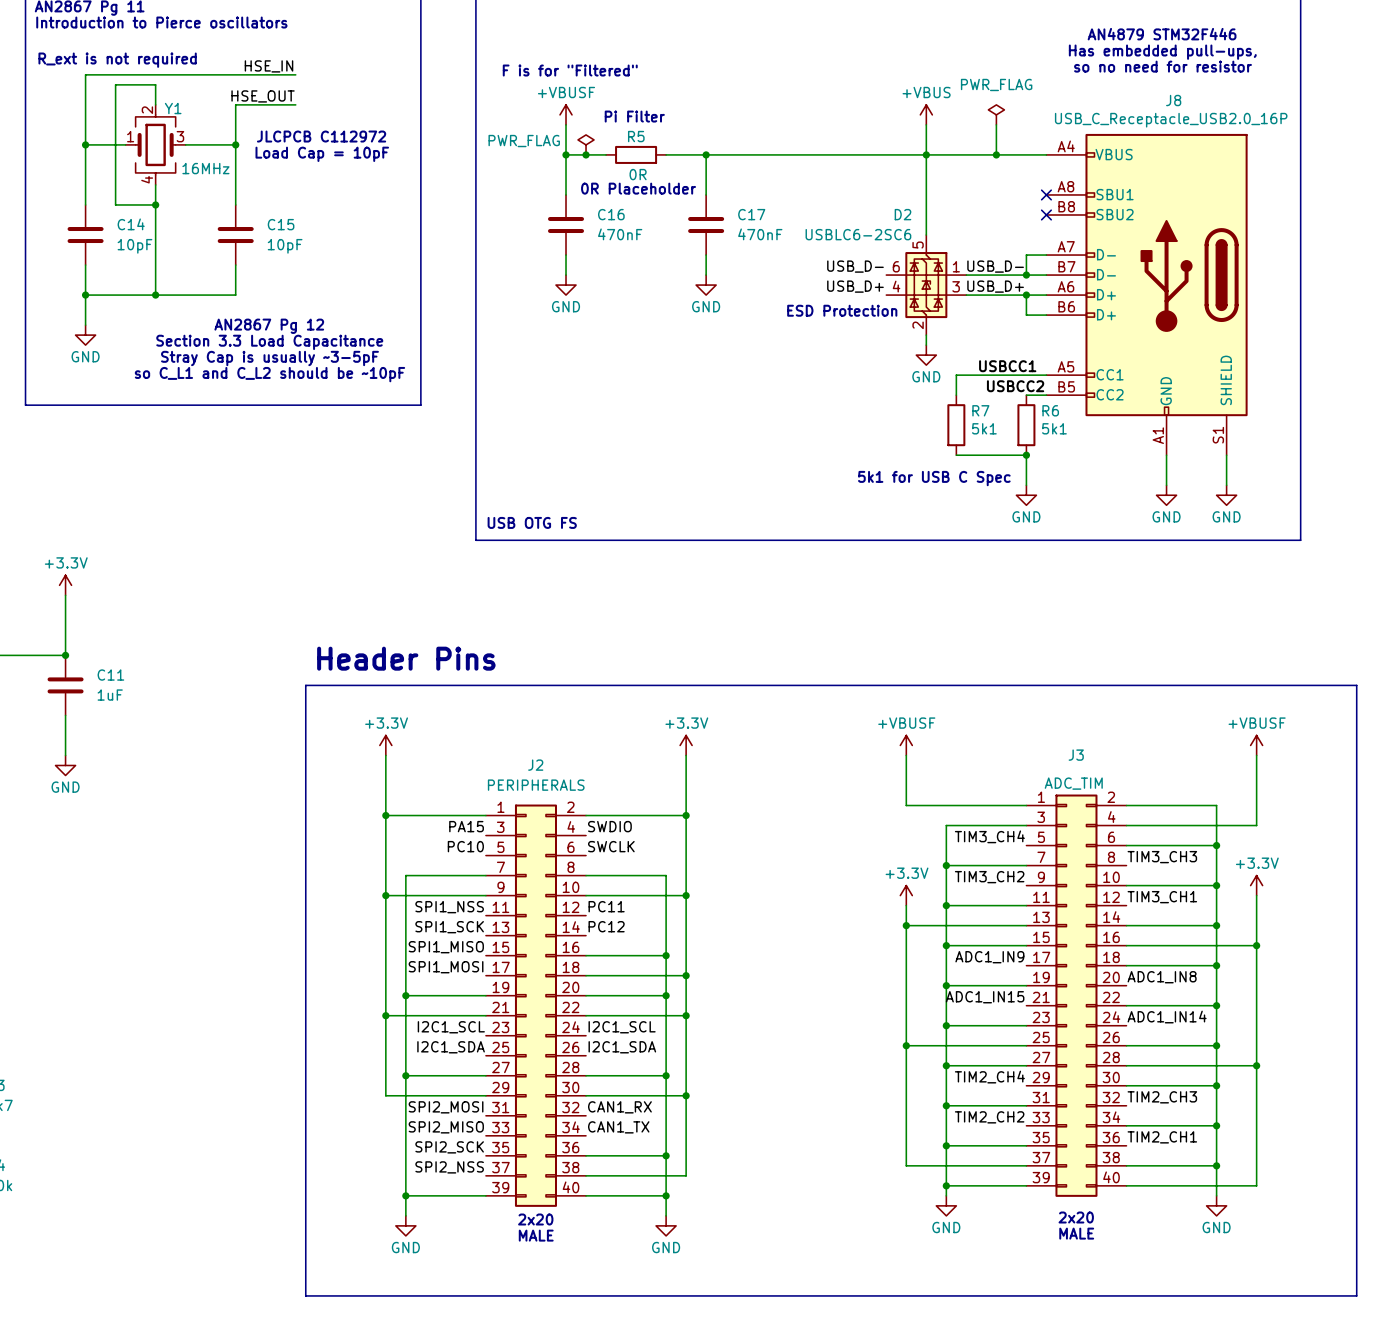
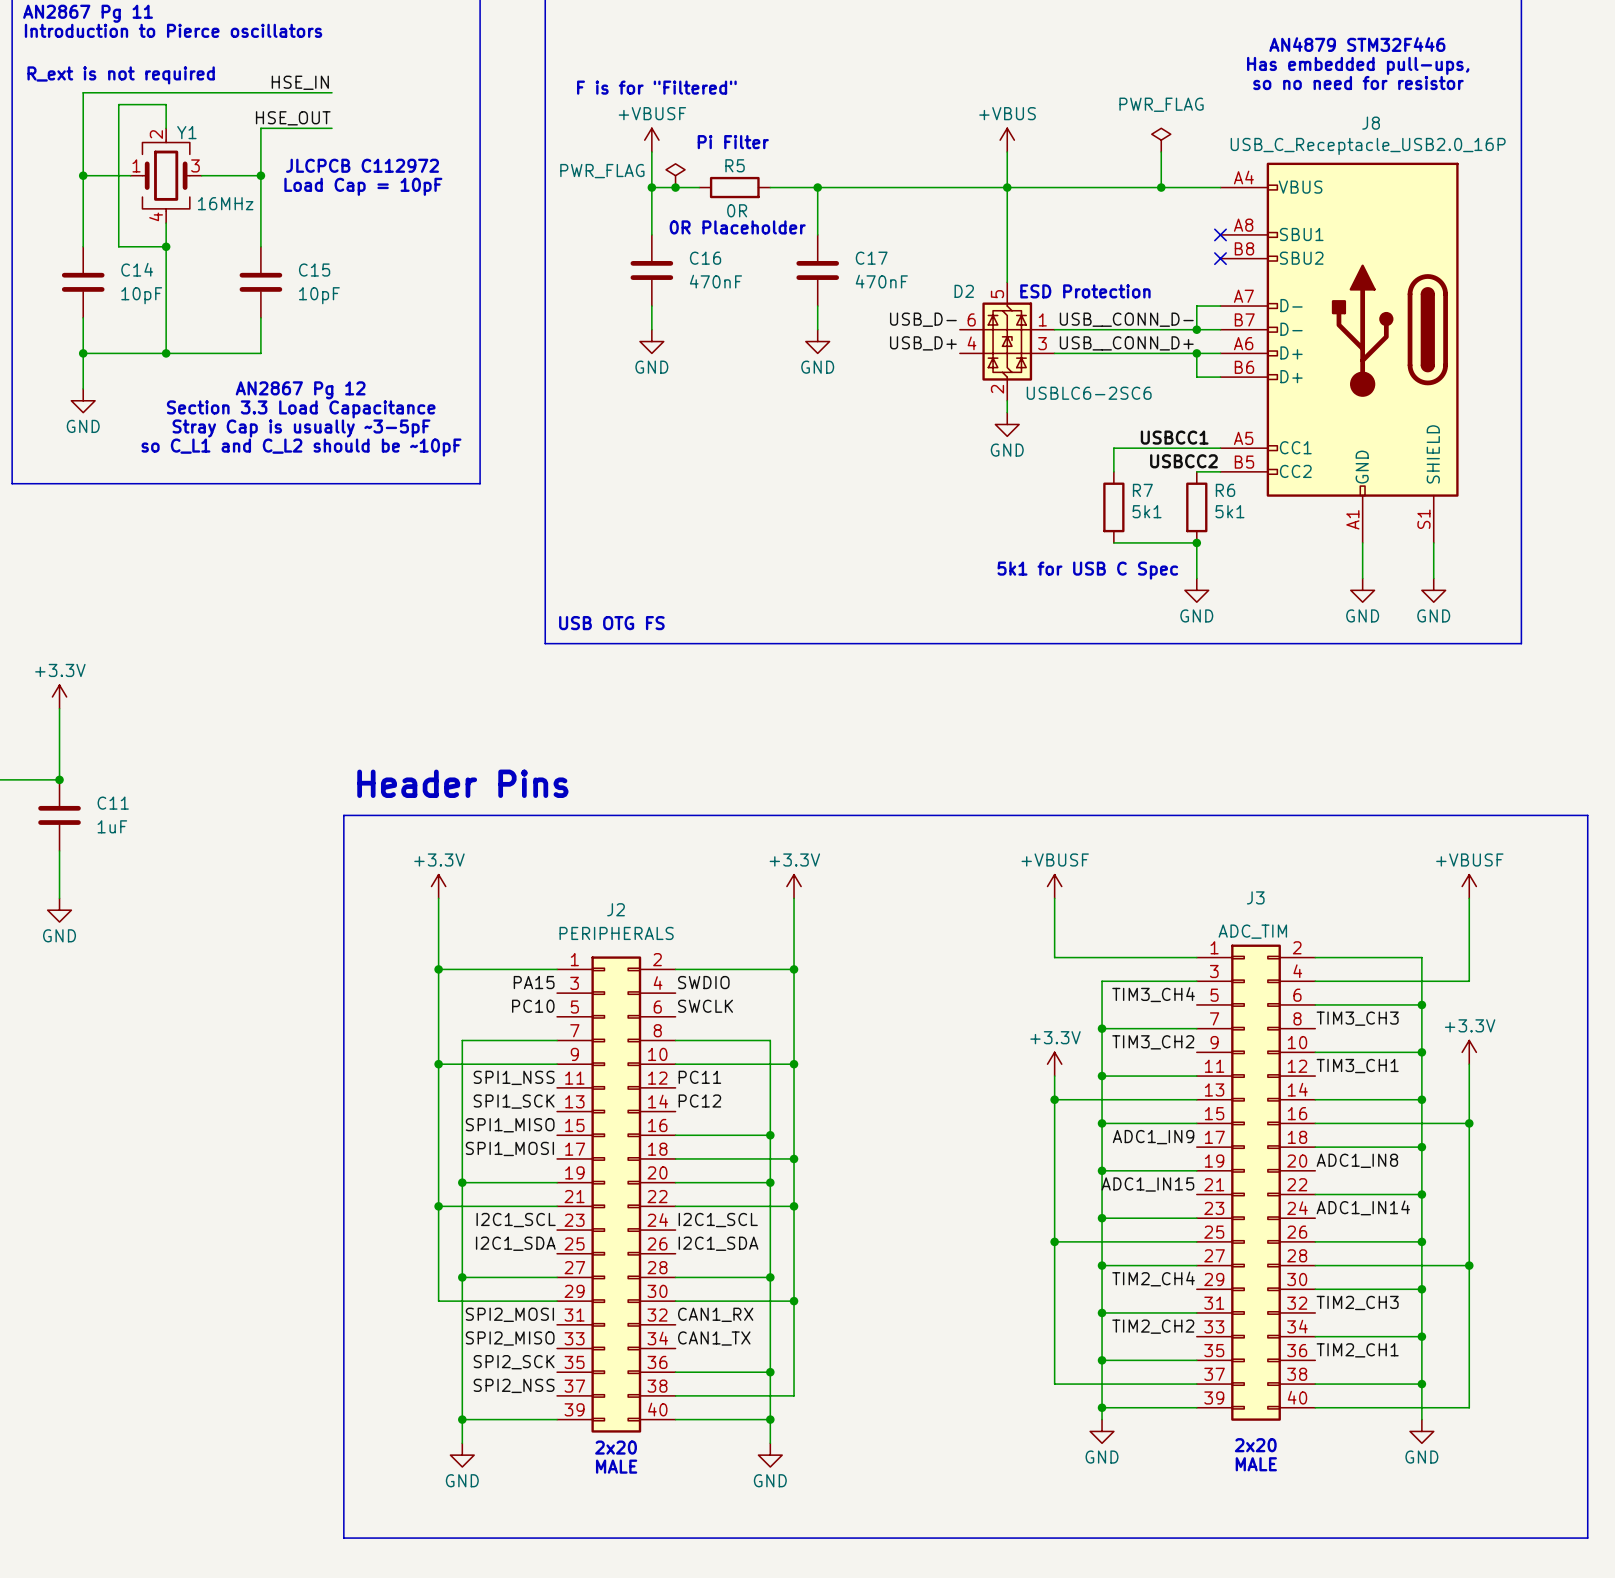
power symbol position: +VBUS (926, 114) -> +VBUS (1007, 140)
wire: (926, 124) (926, 235) -> (1007, 152) (1007, 282)
junction: none -> (1007, 187)
junction: (926, 154) -> none
D2 name position: D2 (902, 214) -> D2 (964, 291)
D2 value position: USBLC6-2SC6 (858, 234) -> USBLC6-2SC6 (1089, 393)
label position: USB_D- (855, 266) -> USB_D- (923, 319)
label: USB_D- (995, 266) -> USB__CONN_D- (1126, 319)
D2 position: (926, 285) -> (1007, 341)
label position: USB_D+ (855, 286) -> USB_D+ (923, 343)
label: USB_D+ (995, 286) -> USB__CONN_D+ (1126, 343)
text position: ESD Protection (842, 310) -> ESD Protection (1085, 291)
wire: (926, 335) (926, 345) -> (1007, 400) (1007, 412)
power symbol position: GND (926, 355) -> GND (1007, 424)

